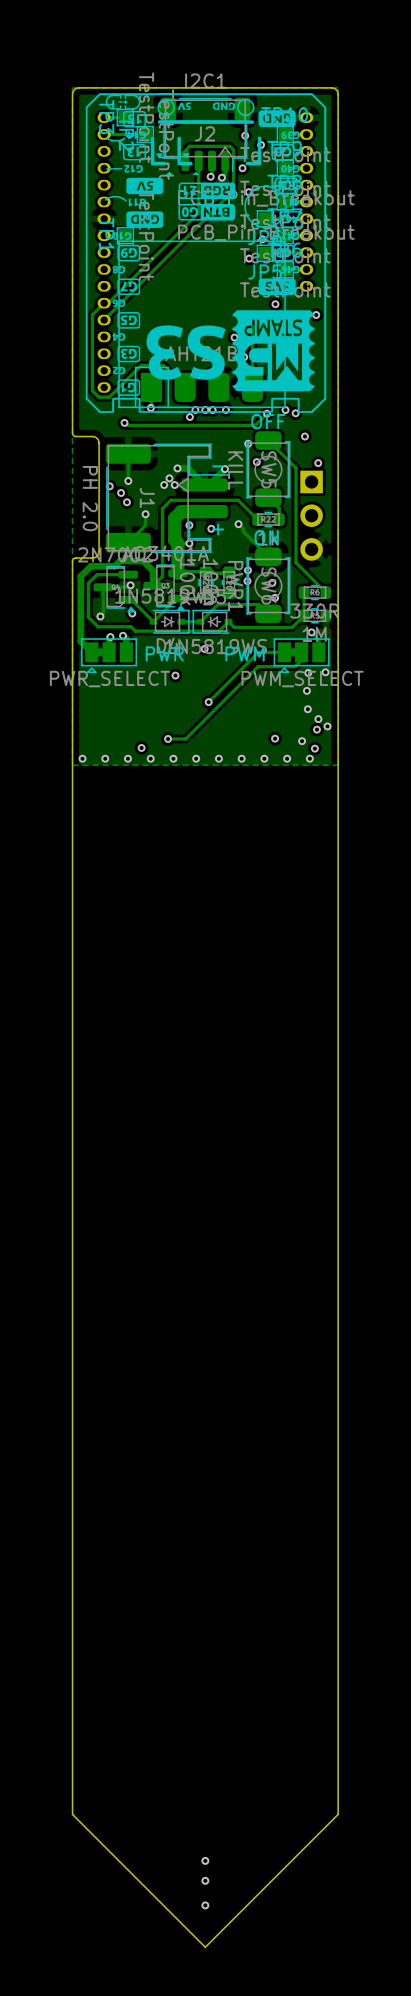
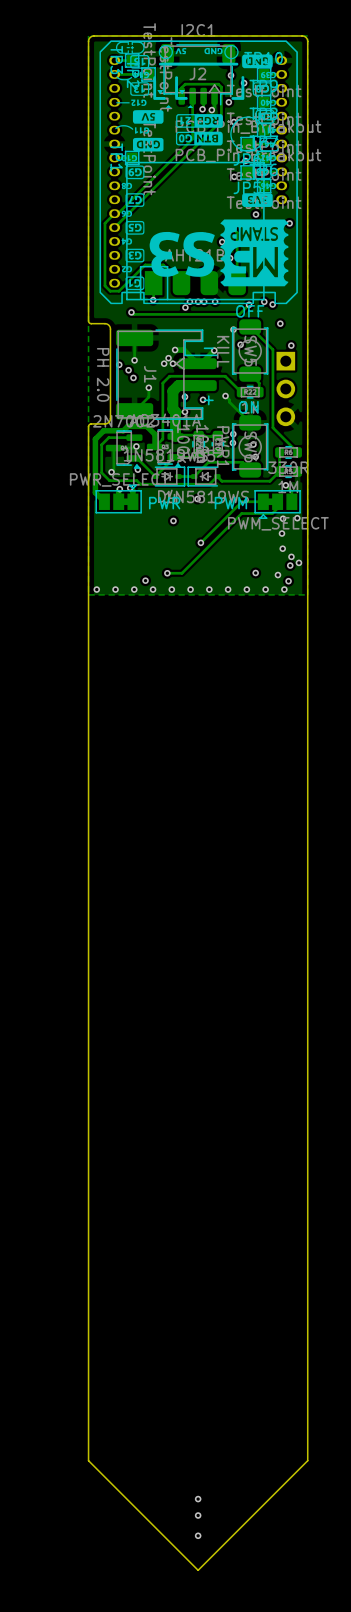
part rotation: 0° (109, 655) -> 180° (118, 499)

